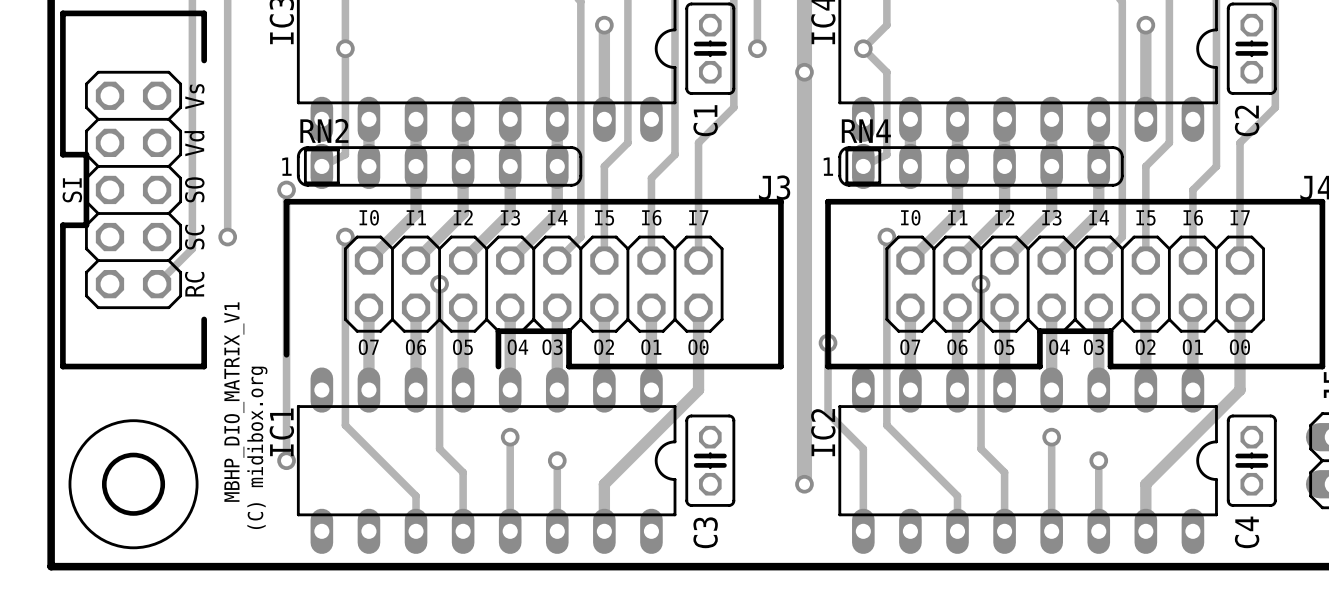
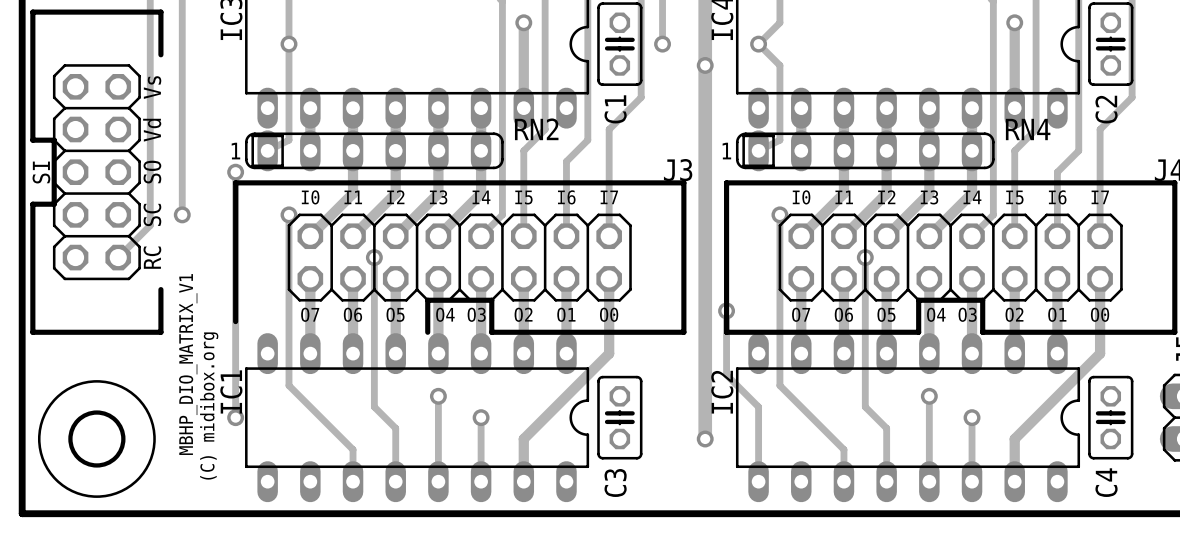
RN2 name position: RN2 (324, 130) -> RN2 (536, 129)
RN4 name position: RN4 (866, 131) -> RN4 (1028, 129)

